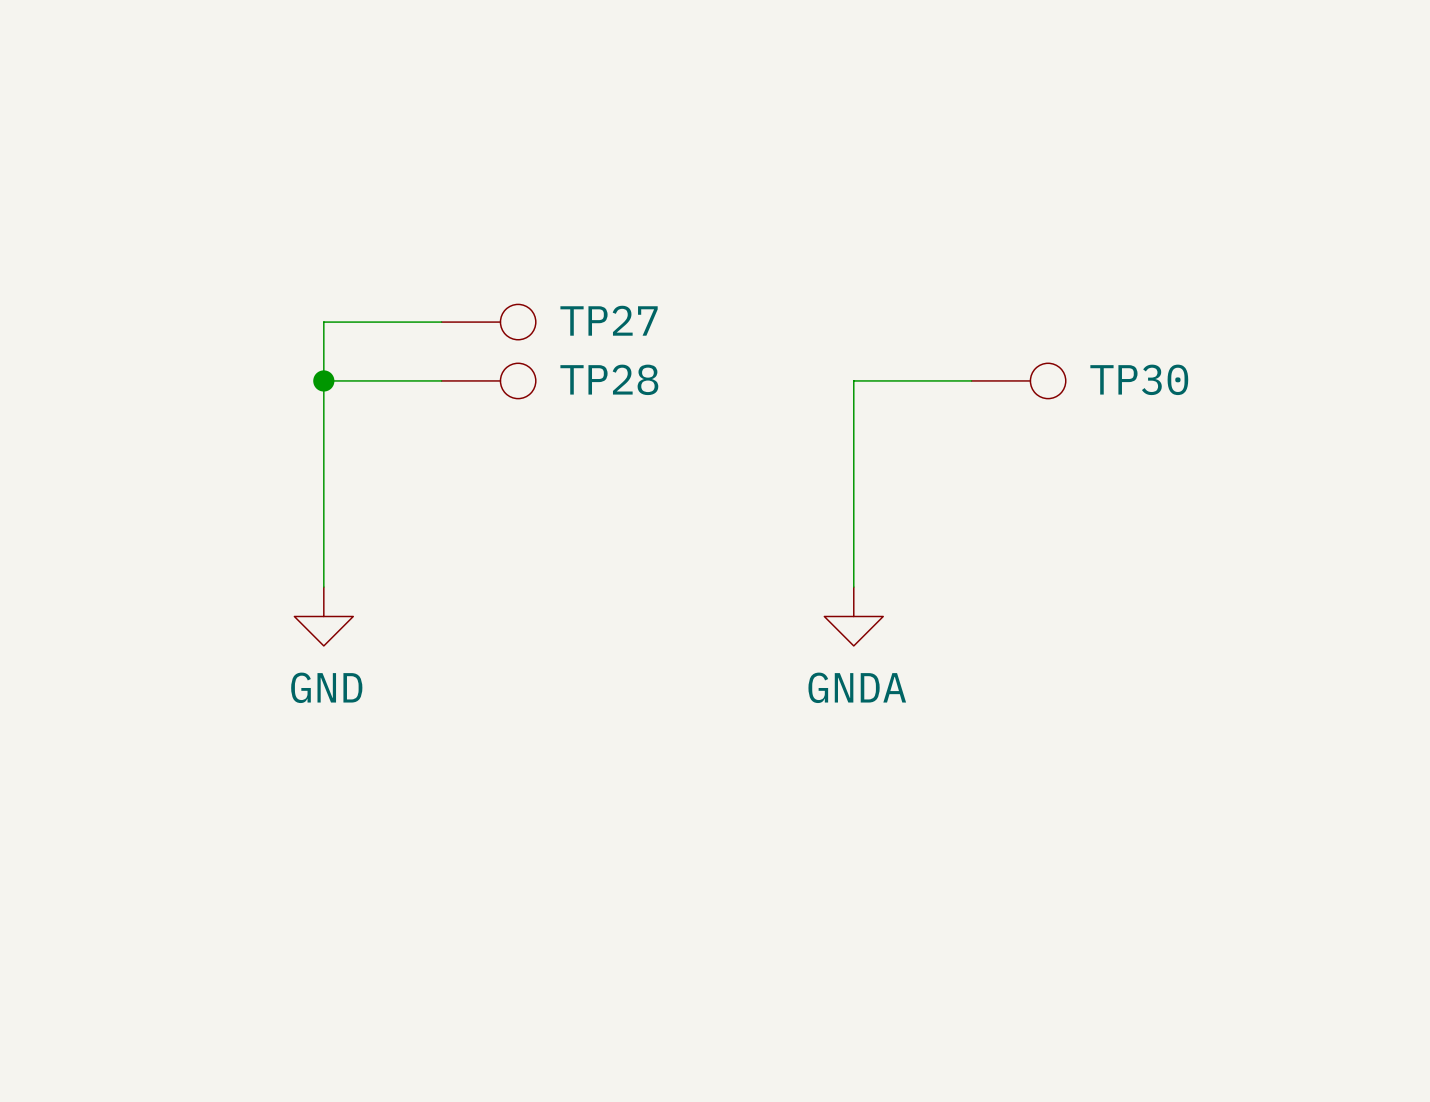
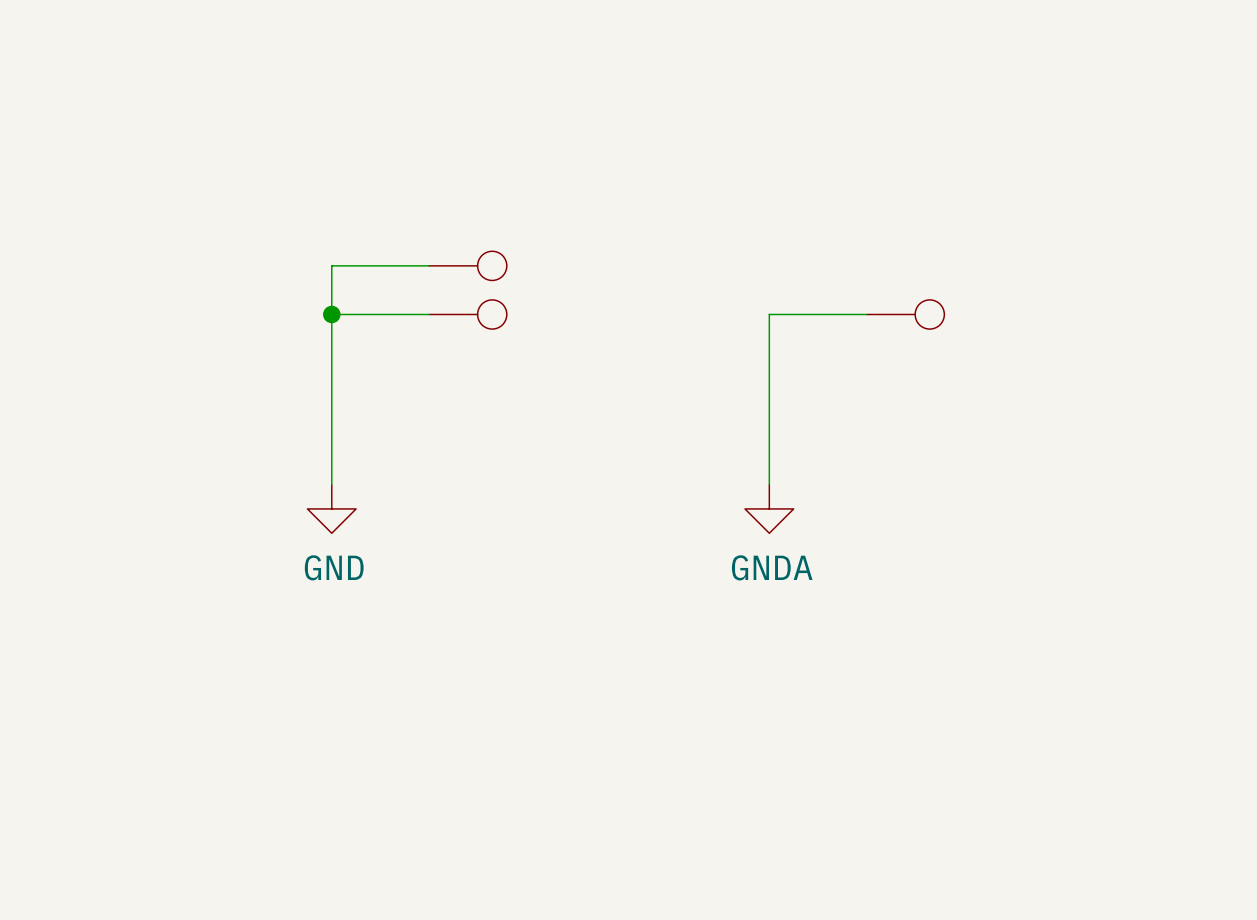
TP27 name: TP27 (609, 320) -> none
TP28 name: TP28 (609, 379) -> none
TP30 name: TP30 (1139, 379) -> none

